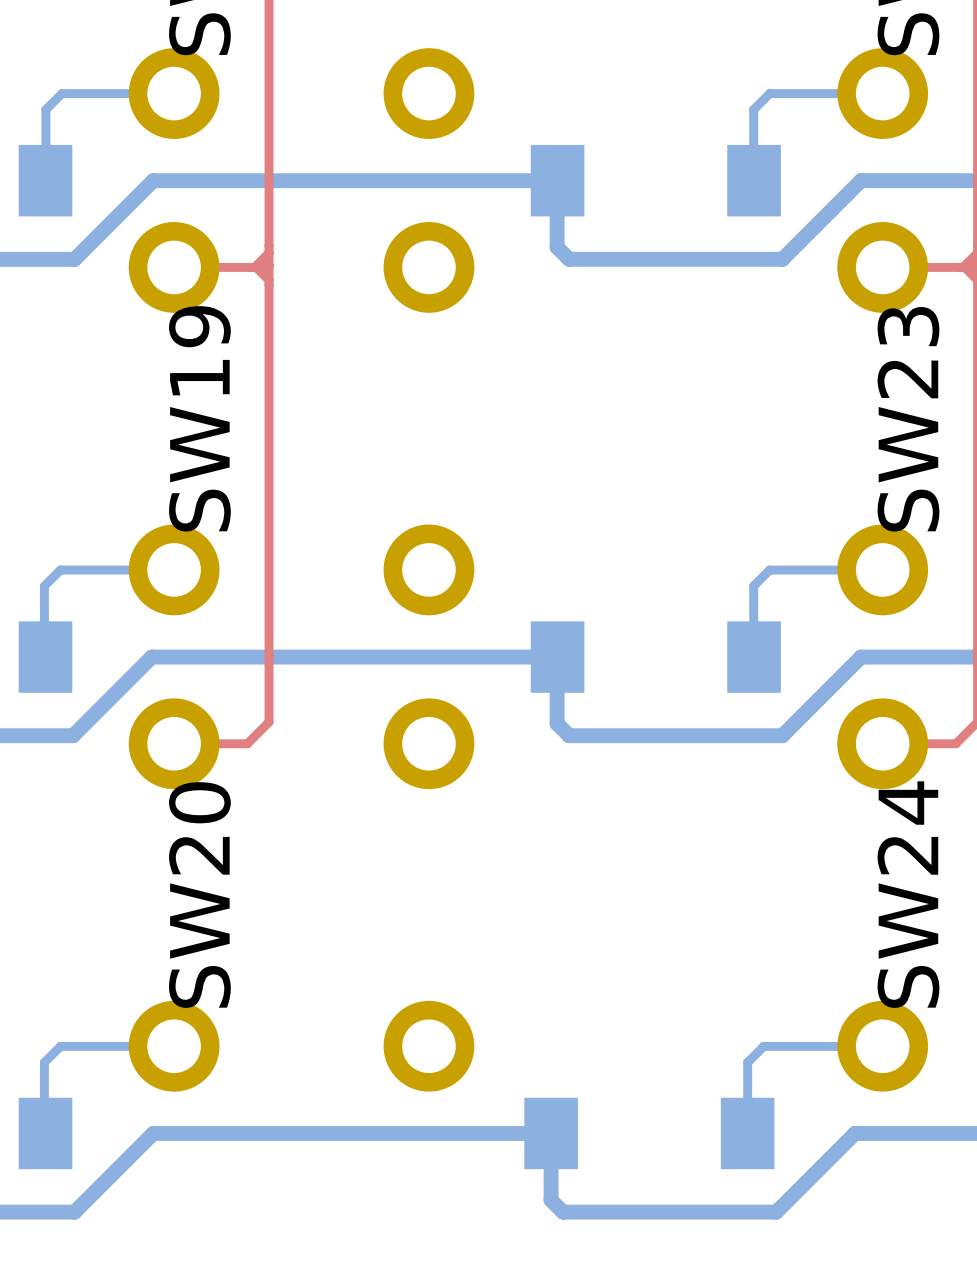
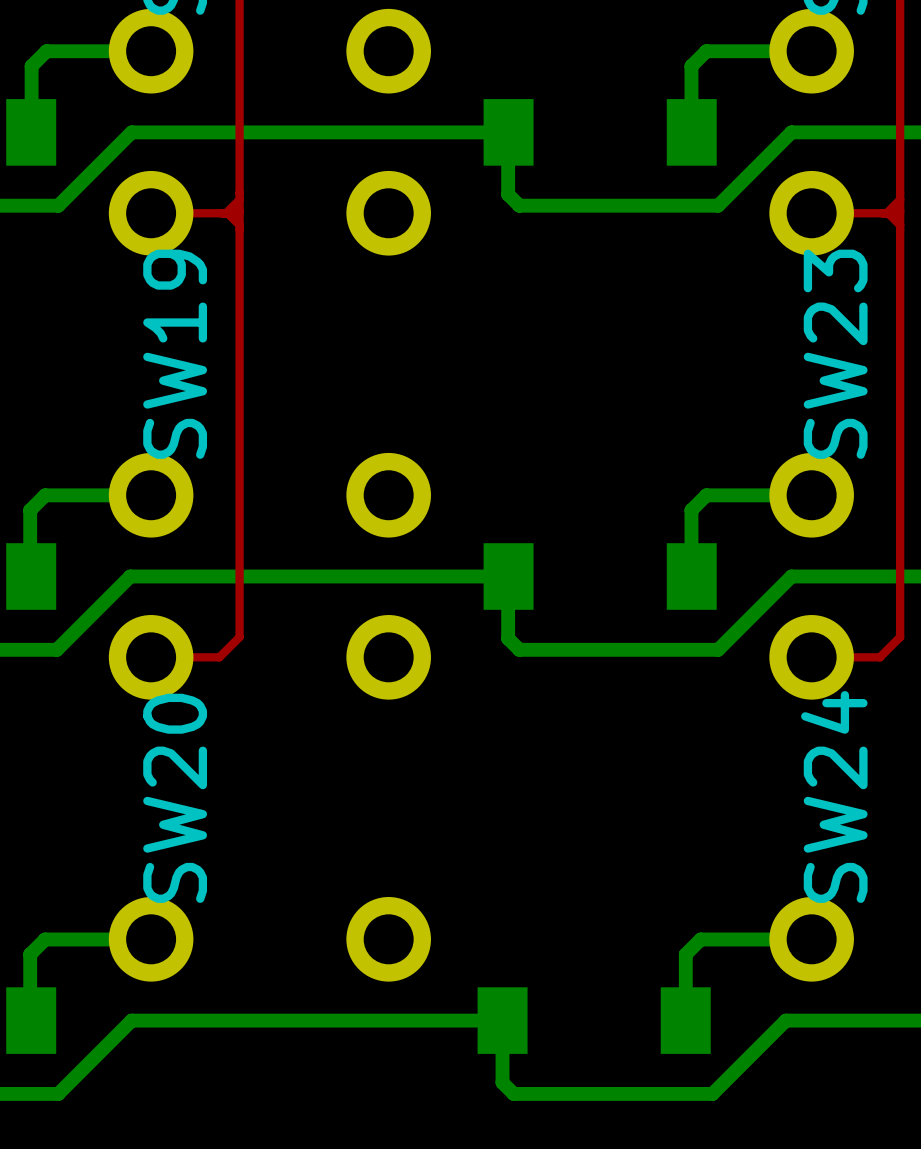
bottom track width: thin (179, 93) (61, 93) (45, 109) (45, 180) -> thick (156, 51) (46, 51) (31, 66) (31, 132)
bottom track width: thin (887, 93) (769, 93) (753, 109) (753, 180) -> thick (815, 51) (706, 51) (691, 66) (691, 132)
bottom track width: thin (177, 570) (60, 570) (44, 586) (44, 657) -> thick (154, 495) (45, 495) (30, 510) (30, 576)
bottom track width: thin (887, 570) (769, 570) (753, 586) (753, 657) -> thick (815, 495) (706, 495) (691, 510) (691, 576)
bottom track width: thin (177, 1046) (60, 1046) (44, 1062) (44, 1133) -> thick (154, 939) (45, 939) (30, 954) (30, 1020)
bottom track width: thin (881, 1046) (763, 1046) (747, 1062) (747, 1133) -> thick (810, 939) (700, 939) (685, 954) (685, 1020)

